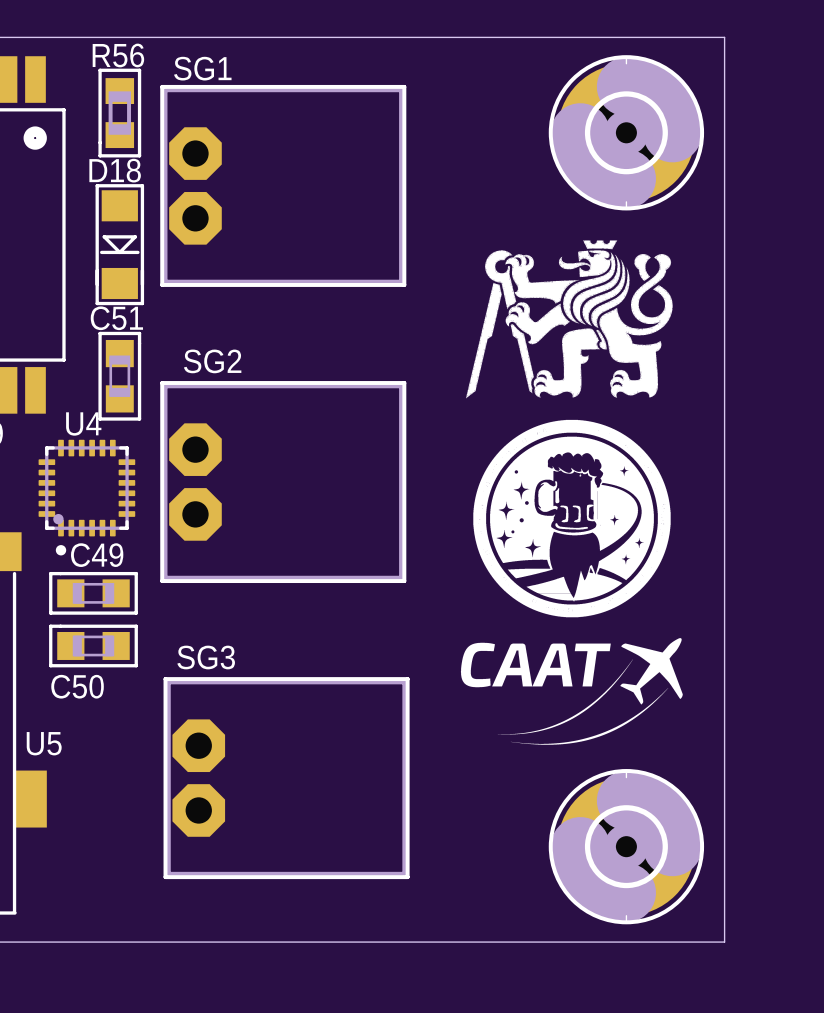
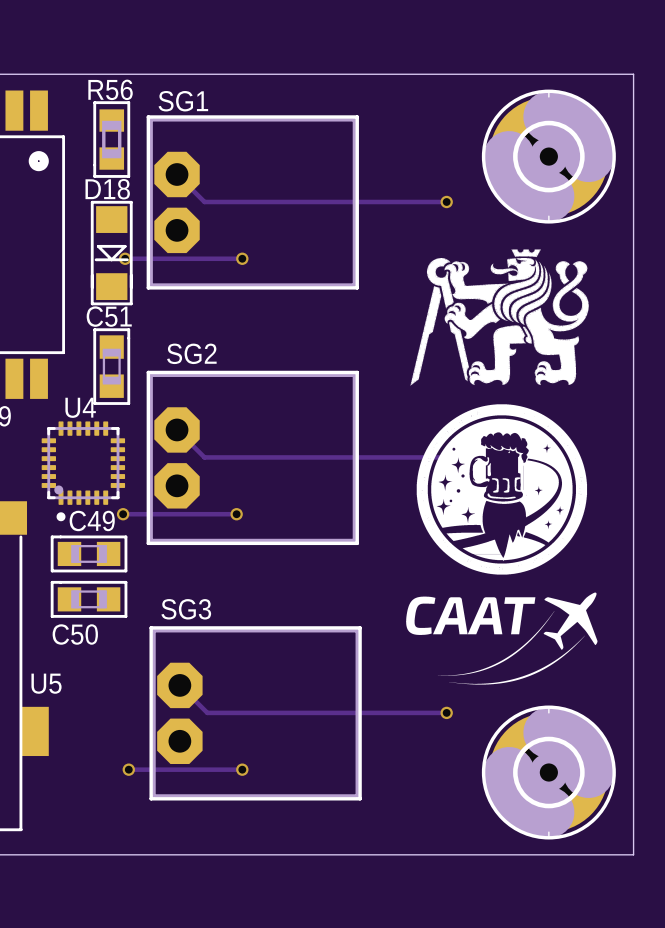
track: none -> (177, 174) (204, 201) (446, 201)
via: none -> (446, 201)
track: none -> (125, 258) (242, 258)
via: none -> (125, 258)
via: none -> (242, 258)
track: none -> (177, 429) (204, 457) (446, 457)
track: none -> (123, 514) (236, 514)
via: none -> (123, 514)
via: none -> (236, 514)
track: none -> (179, 685) (207, 712) (446, 712)
via: none -> (446, 712)
track: none -> (128, 769) (242, 769)
via: none -> (128, 769)
via: none -> (242, 769)

